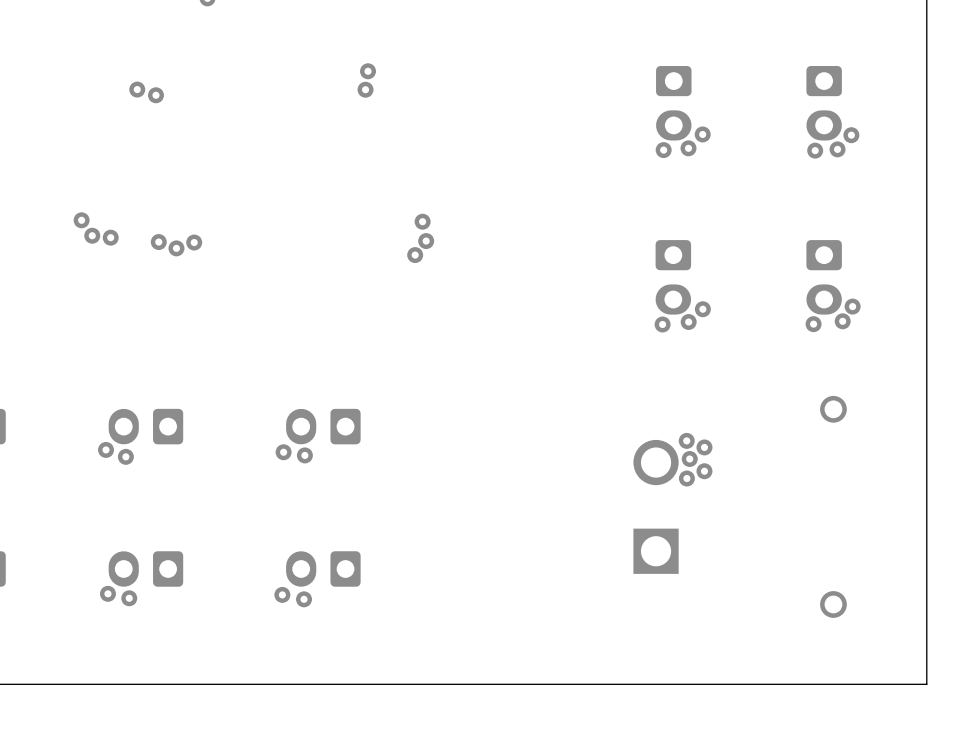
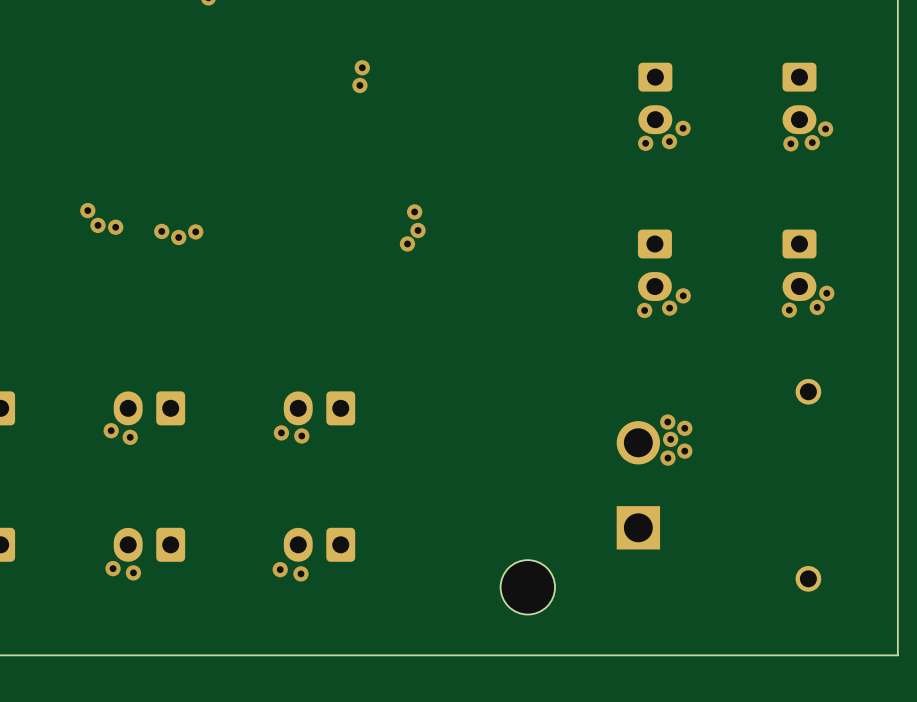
via: (137, 89) -> none
via: (155, 95) -> none
part: none -> (527, 587)

